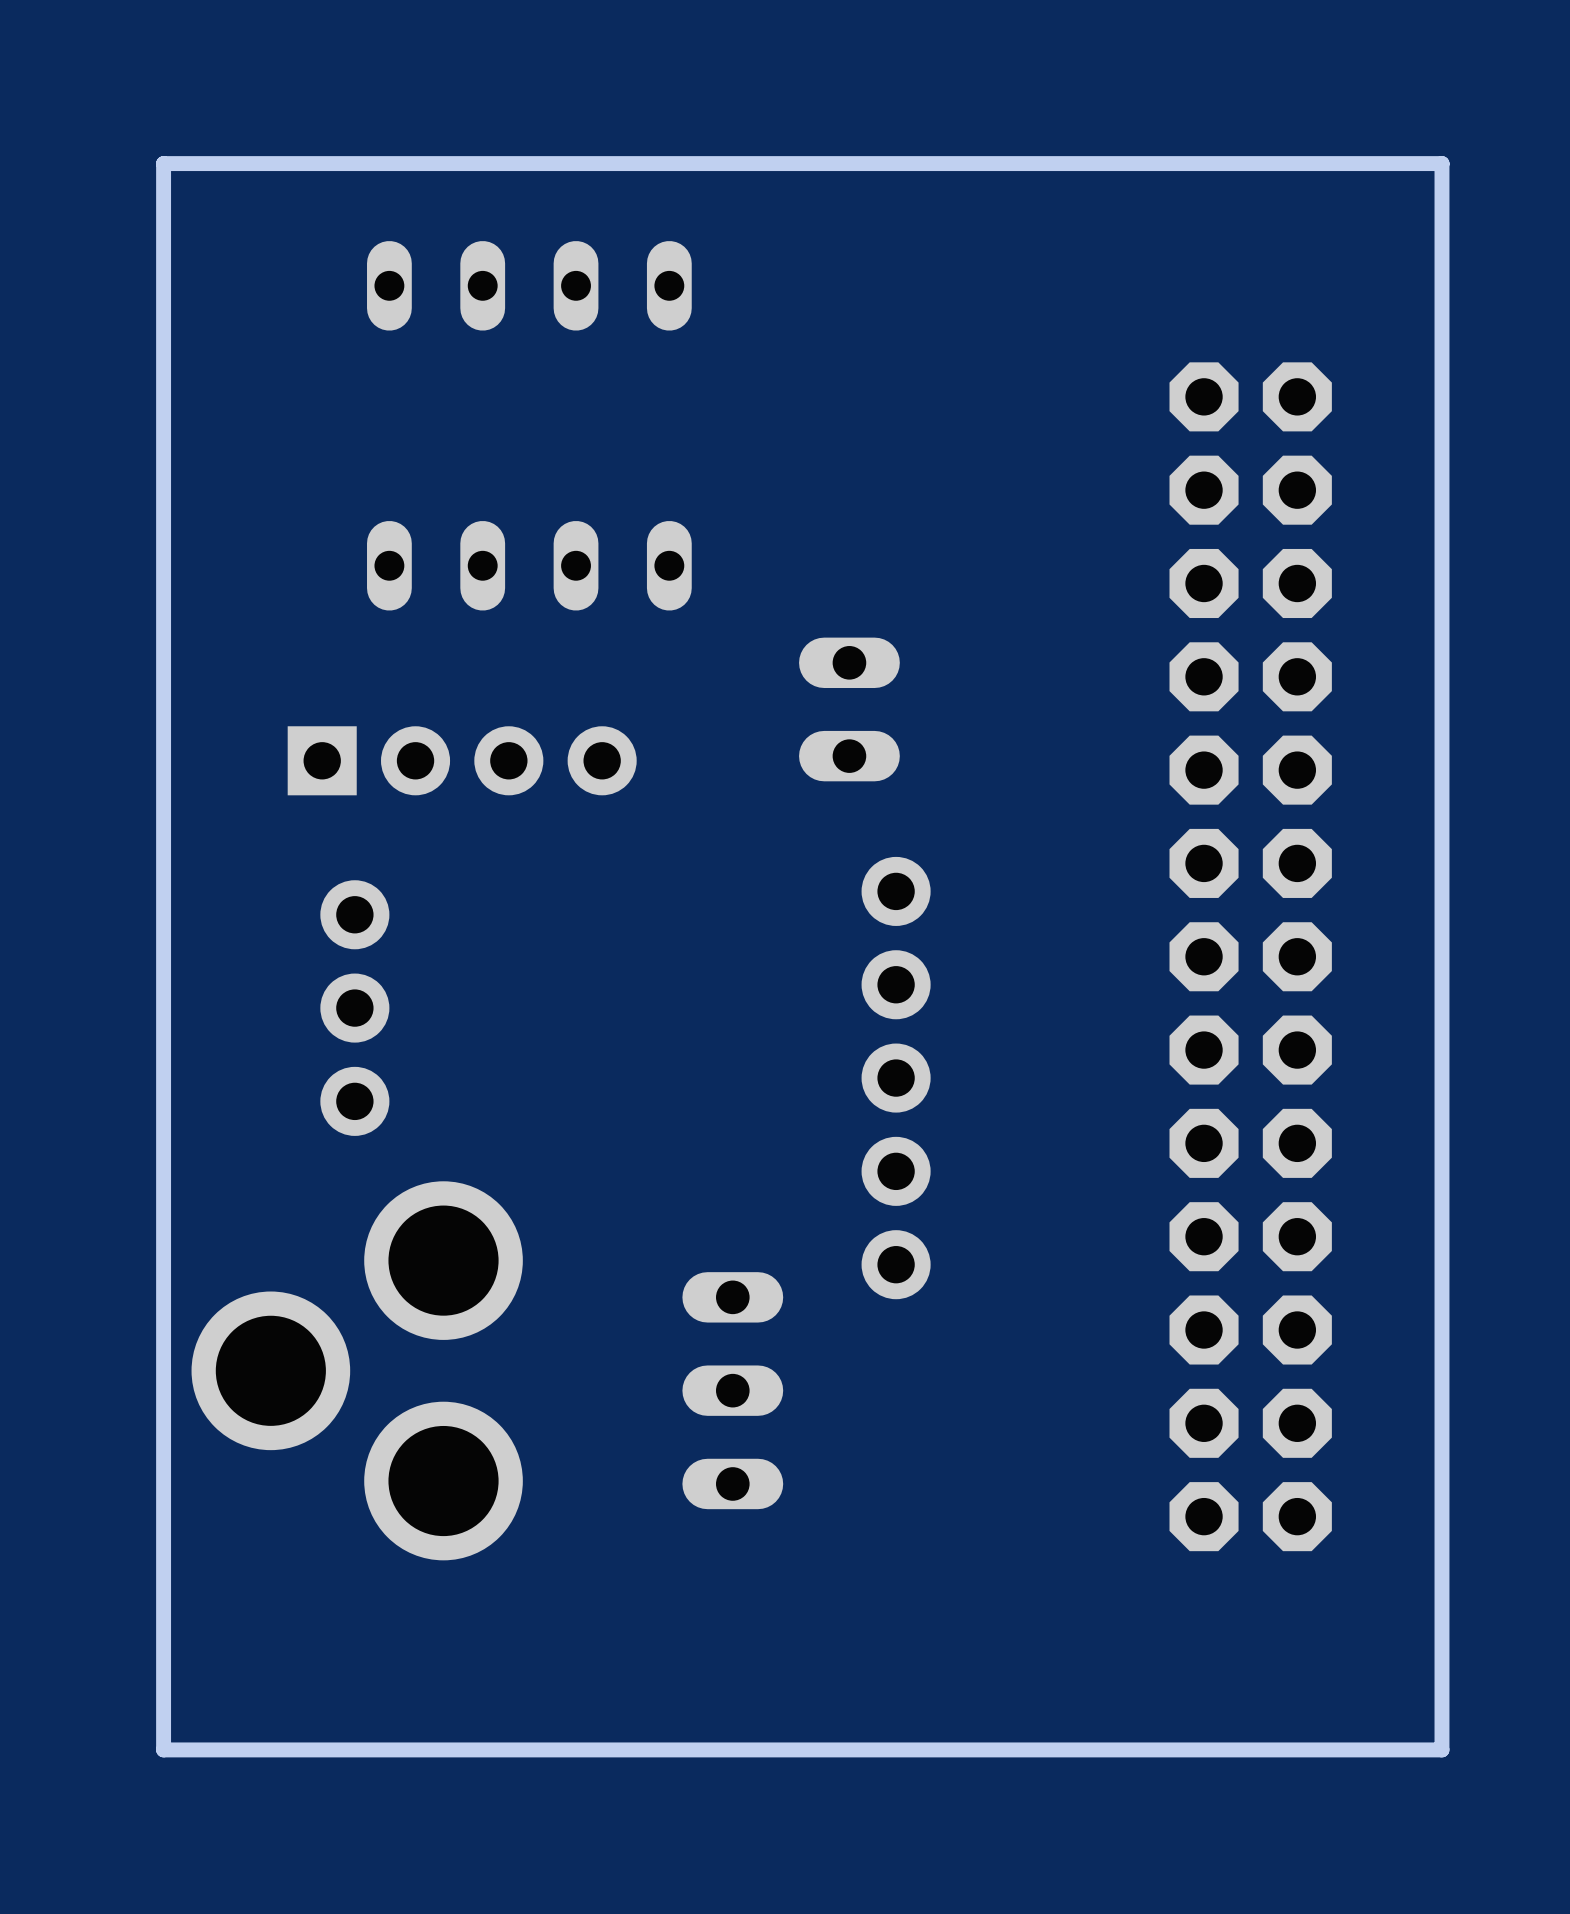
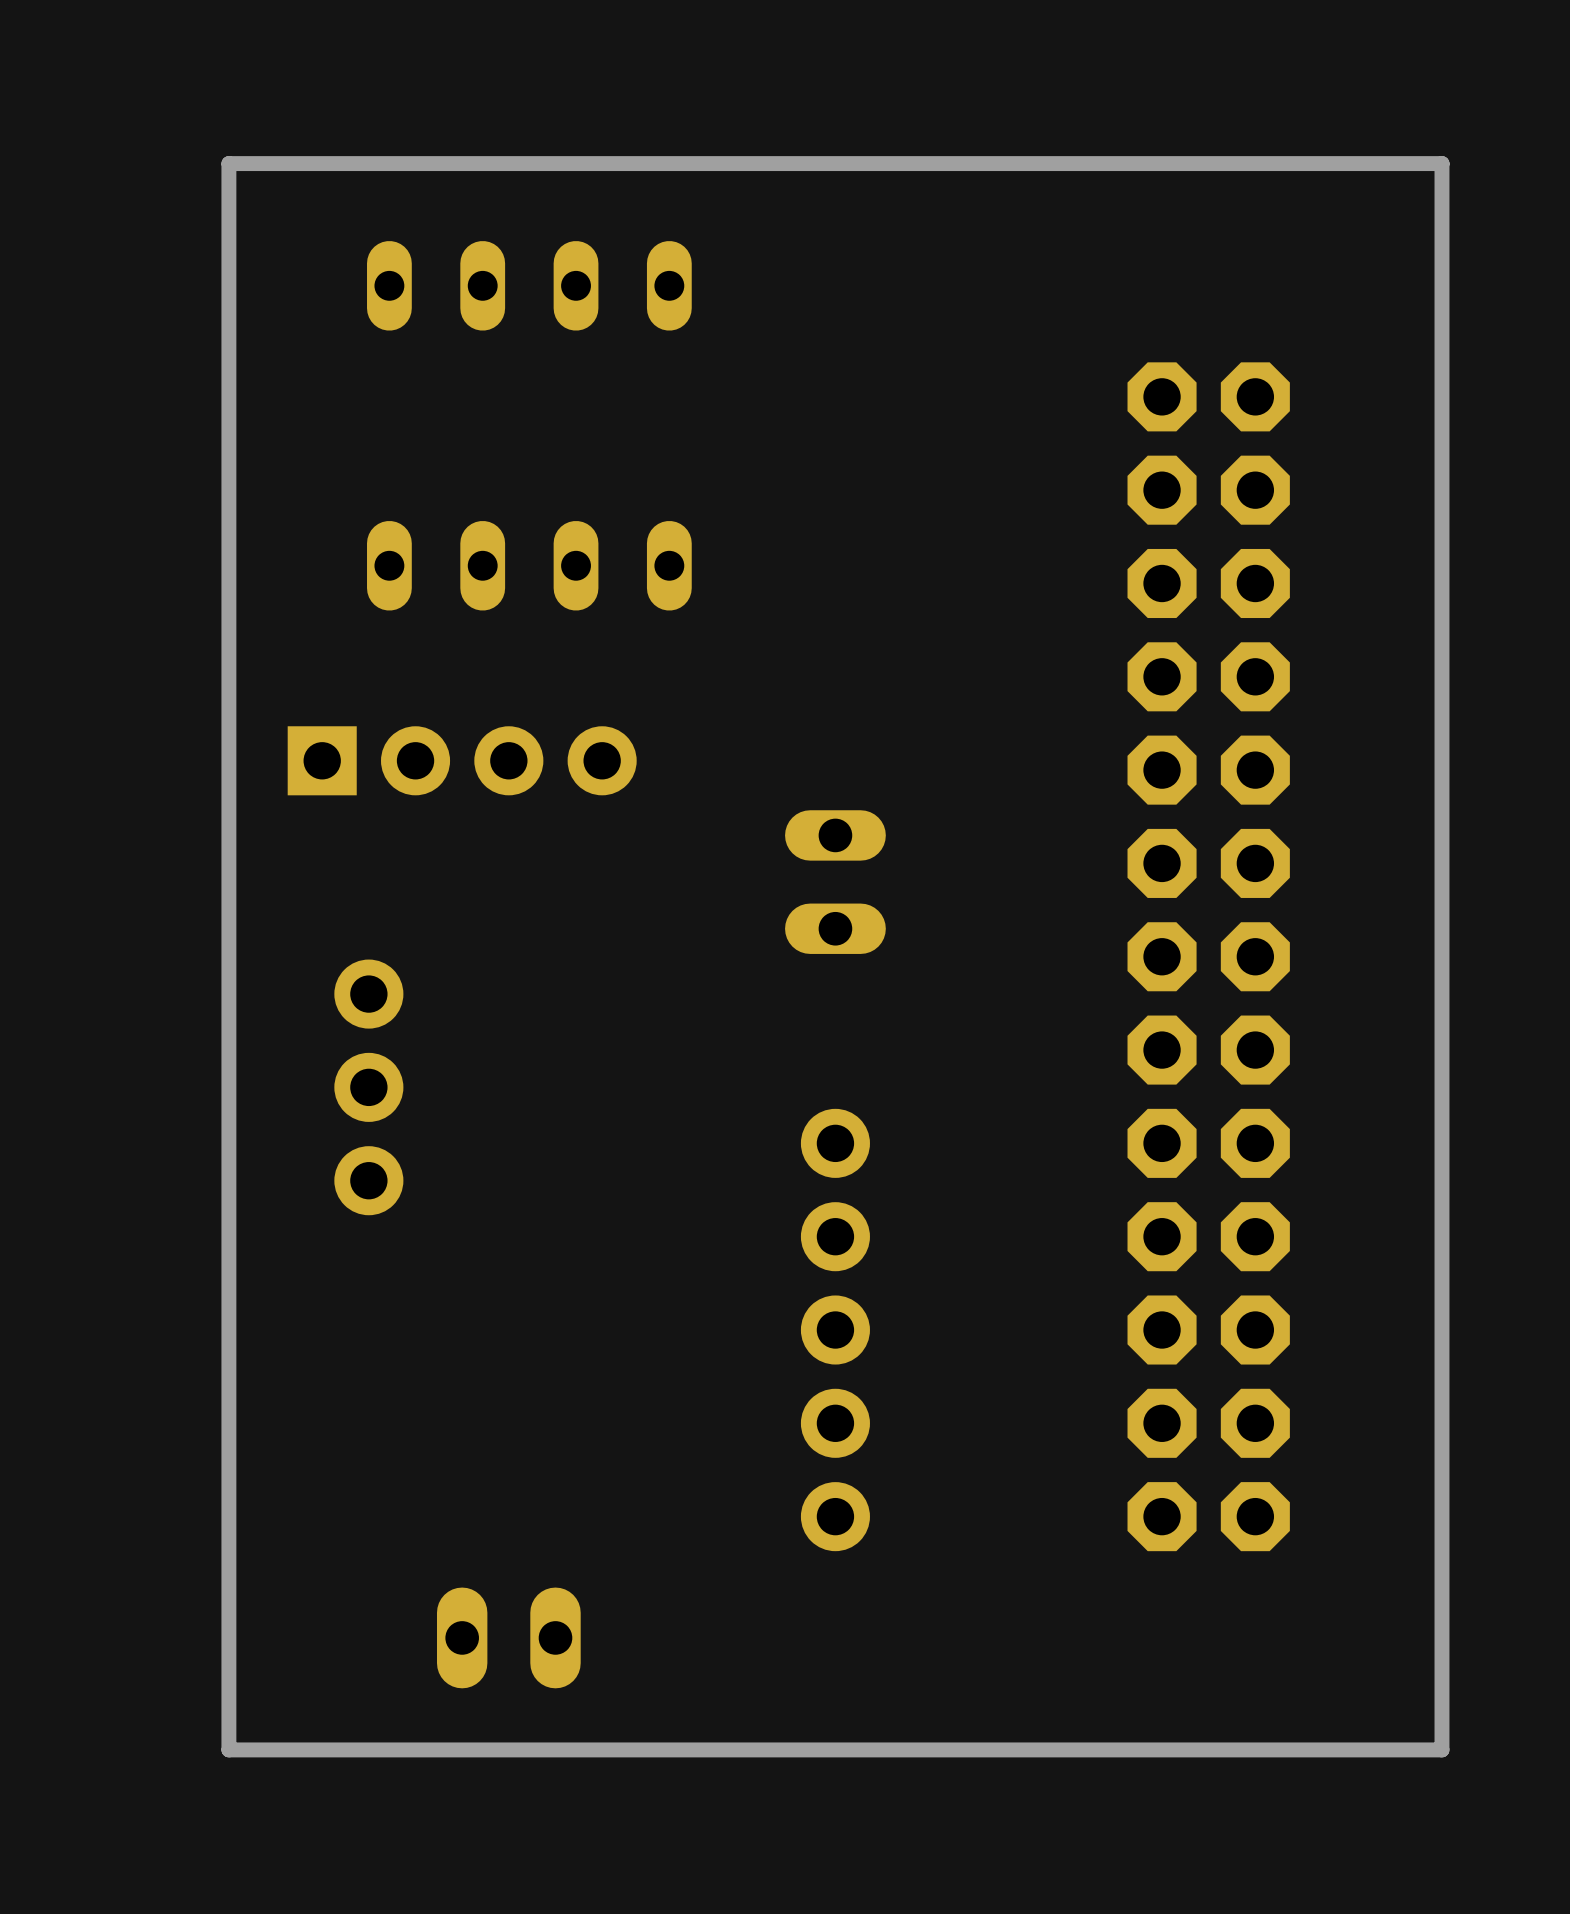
board edge: (228, 163) (163, 163) (163, 1749) (228, 1749) -> (228, 163) (228, 1749)
part position: (849, 709) -> (835, 882)
part position: (1250, 956) -> (1208, 956)
part position: (354, 1008) -> (368, 1087)
part position: (896, 1078) -> (835, 1330)
part: (357, 1370) -> none
part: (732, 1390) -> none
part: none -> (508, 1637)

